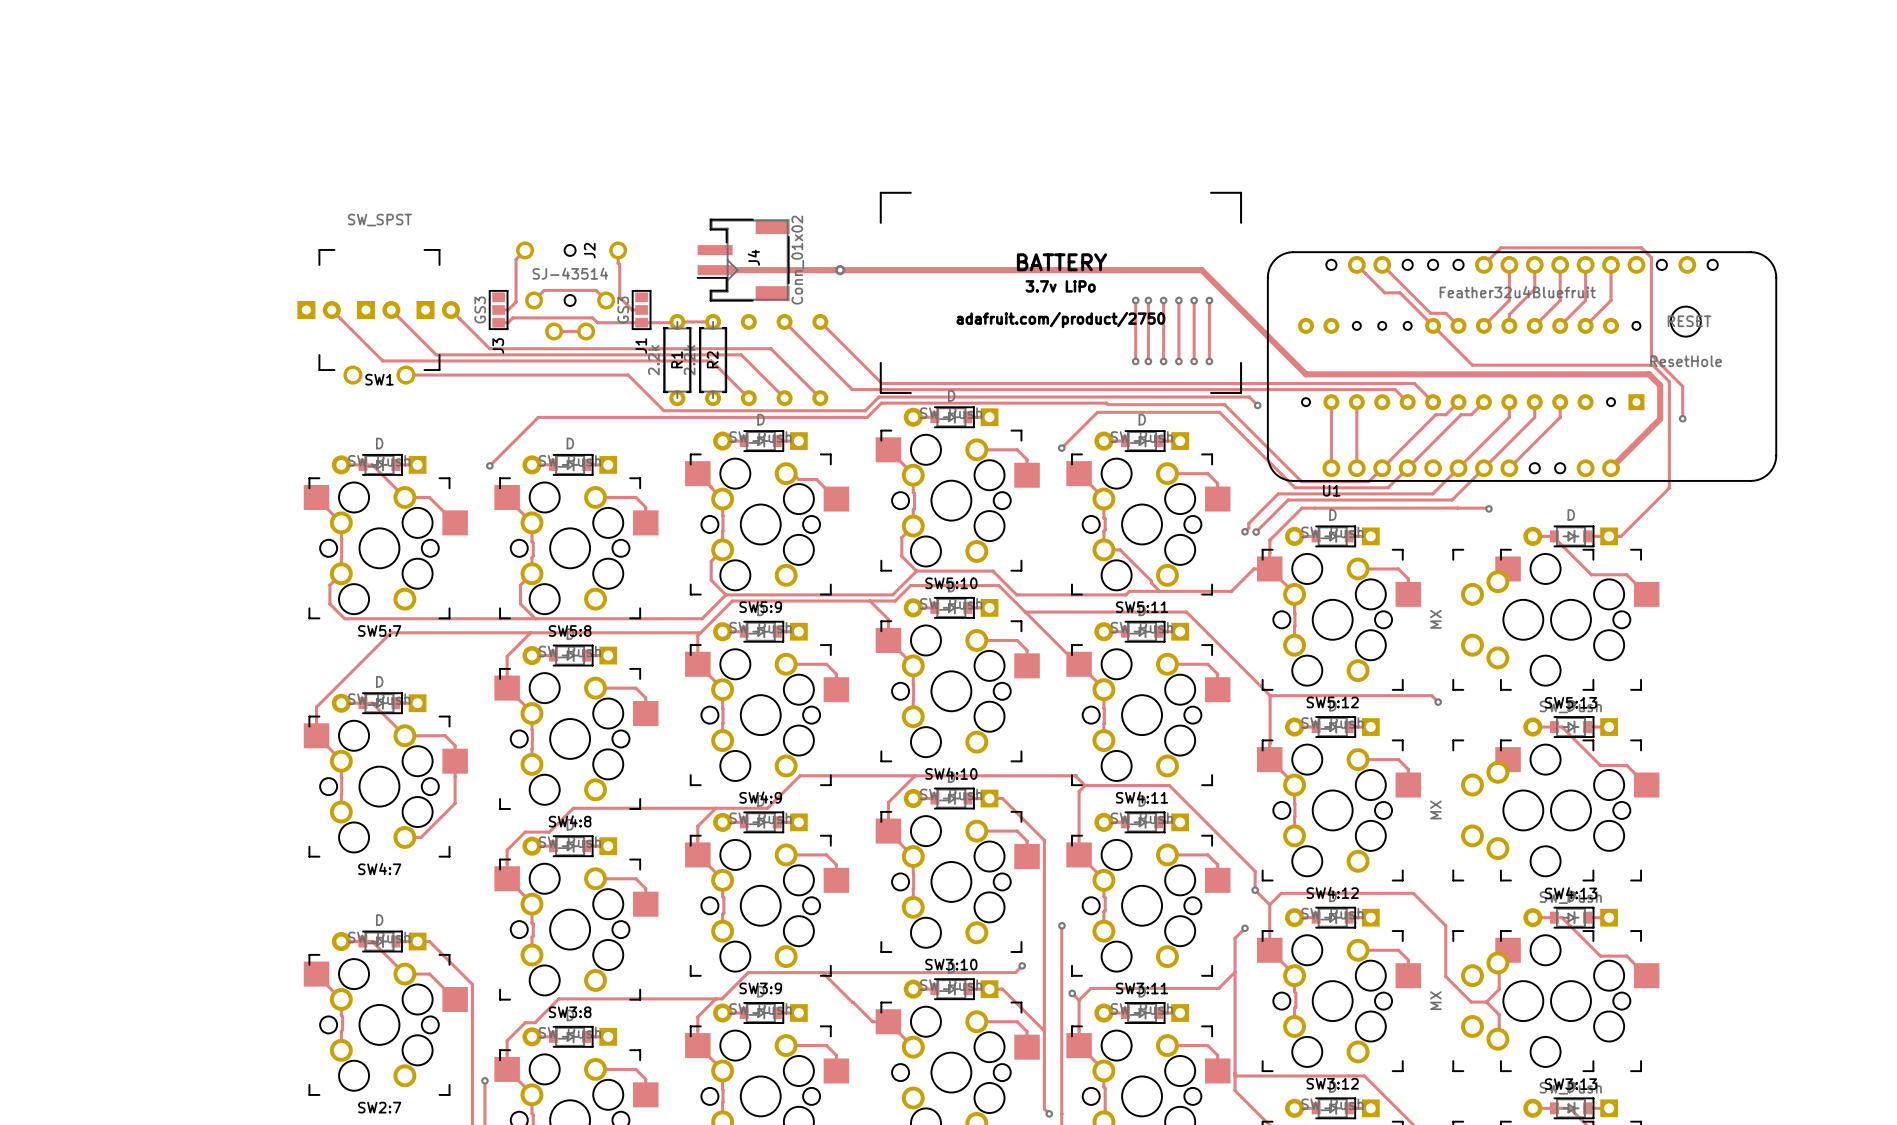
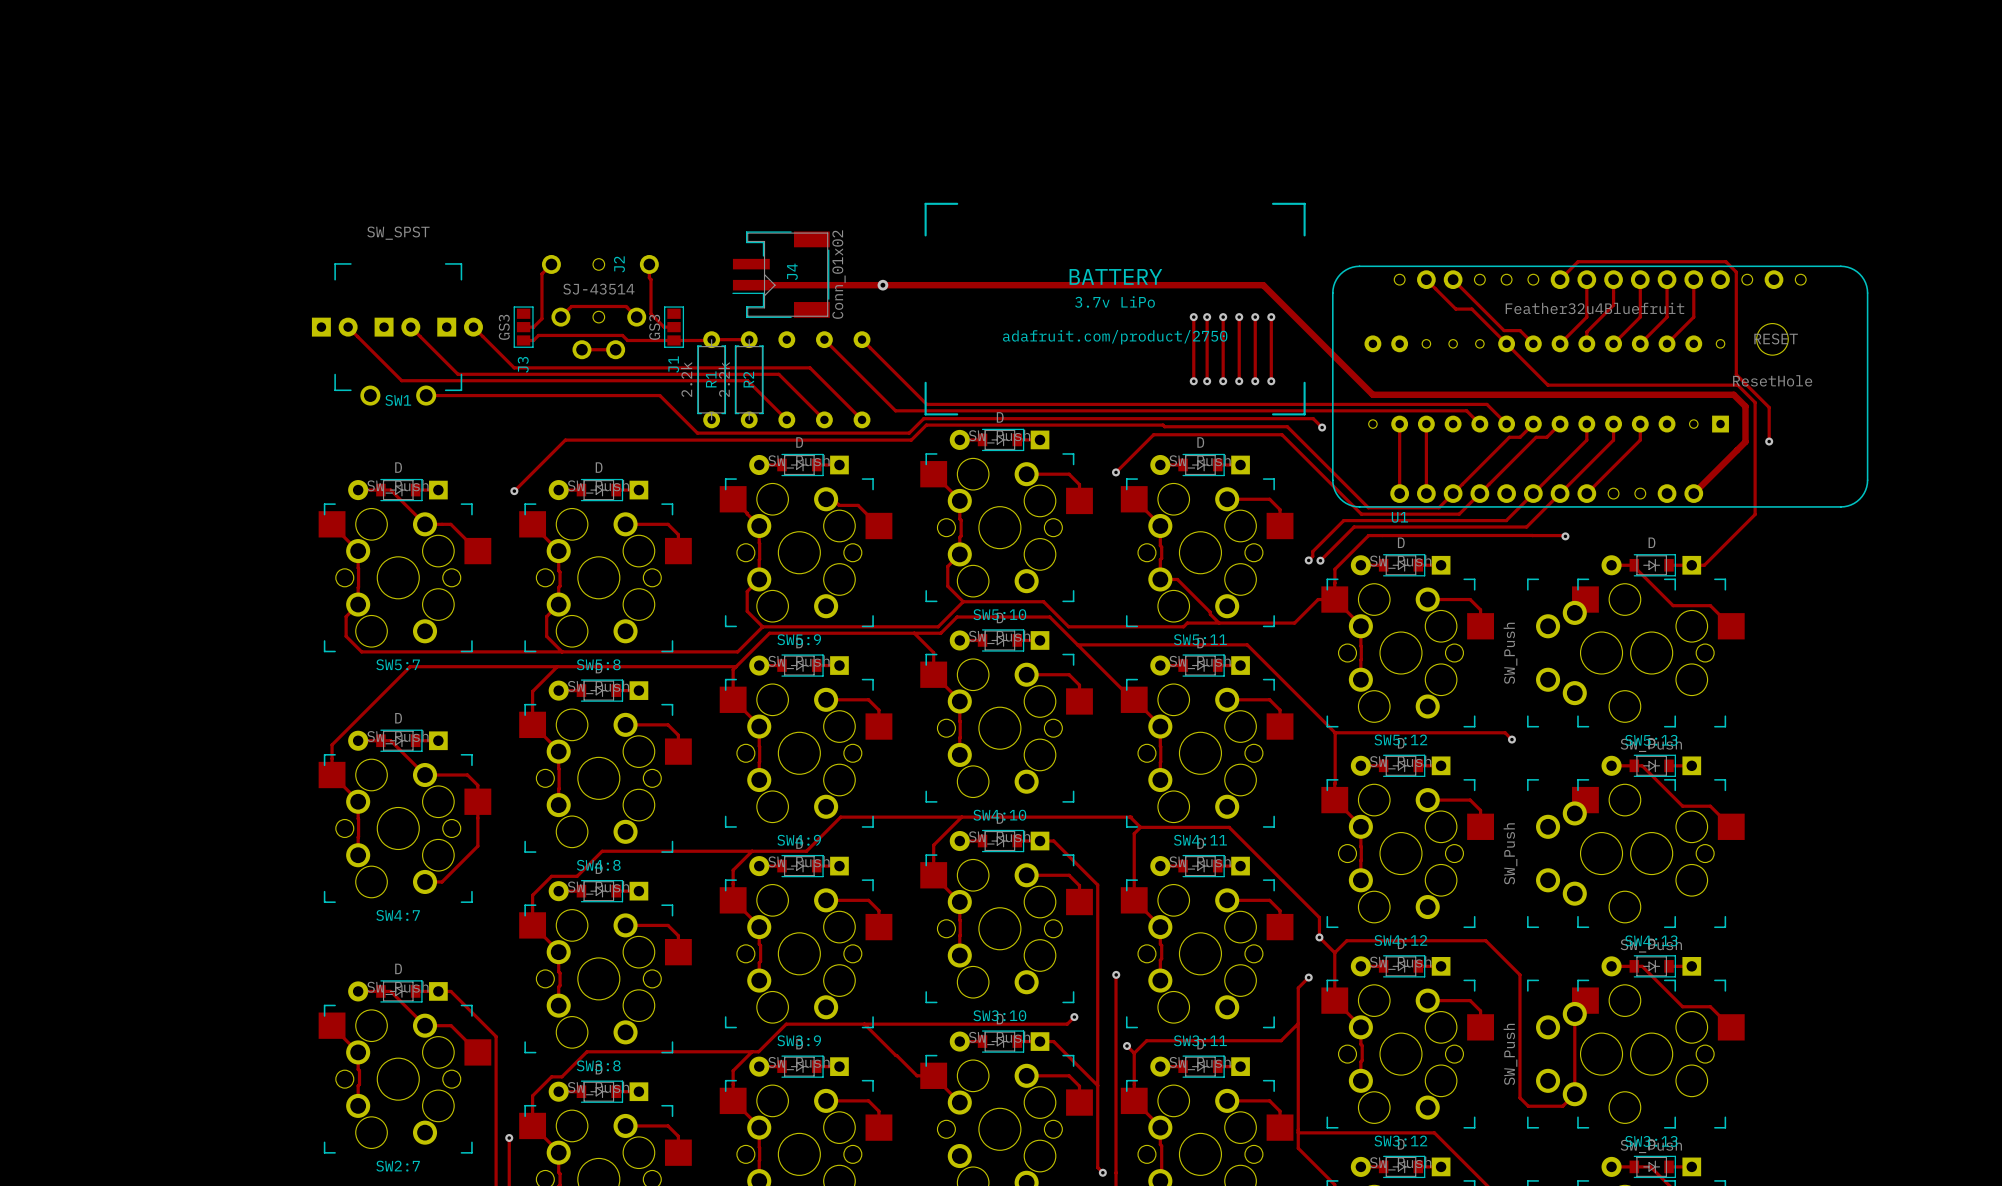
part value: MX (1435, 619) -> SW_Push (1510, 653)
part value: MX (1435, 809) -> SW_Push (1510, 853)
track: (1499, 959) (1499, 989) (1486, 1002) -> none
track: (1445, 976) (1471, 1002) (1486, 1002) -> (1519, 1028) (1519, 1097) (1528, 1106) (1562, 1106) (1574, 1094) (1576, 1009)
part value: MX (1435, 1000) -> SW_Push (1510, 1054)
track: (1486, 1002) (1499, 1014) (1499, 1040) -> none

